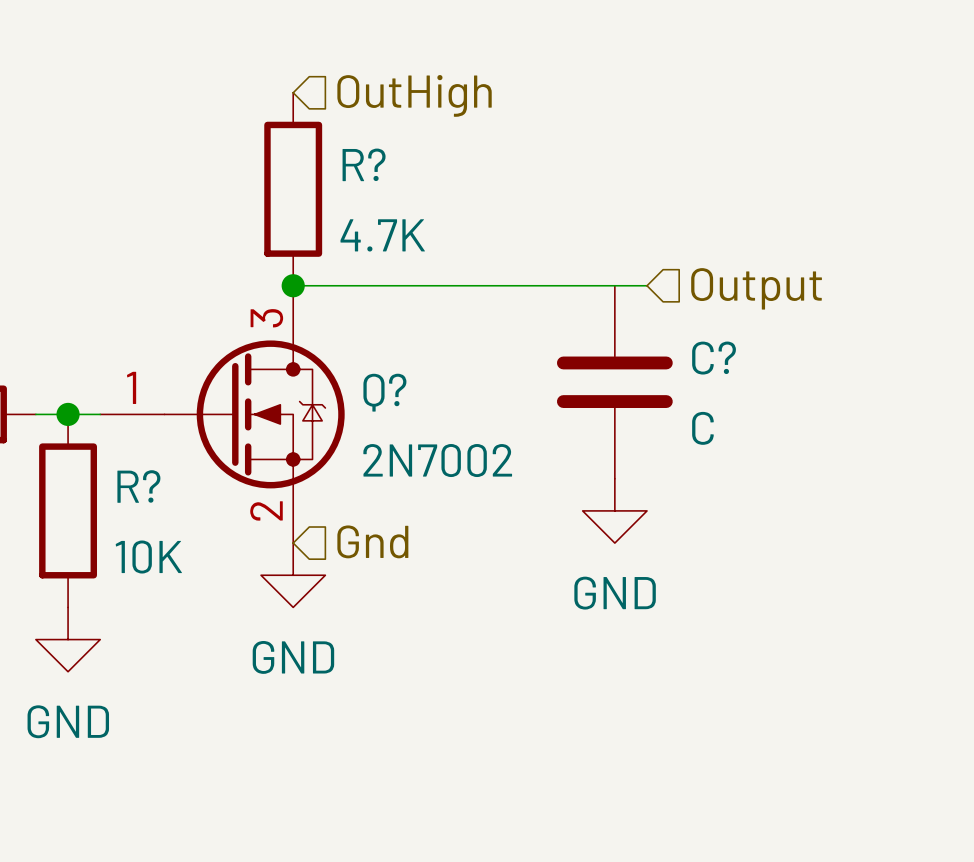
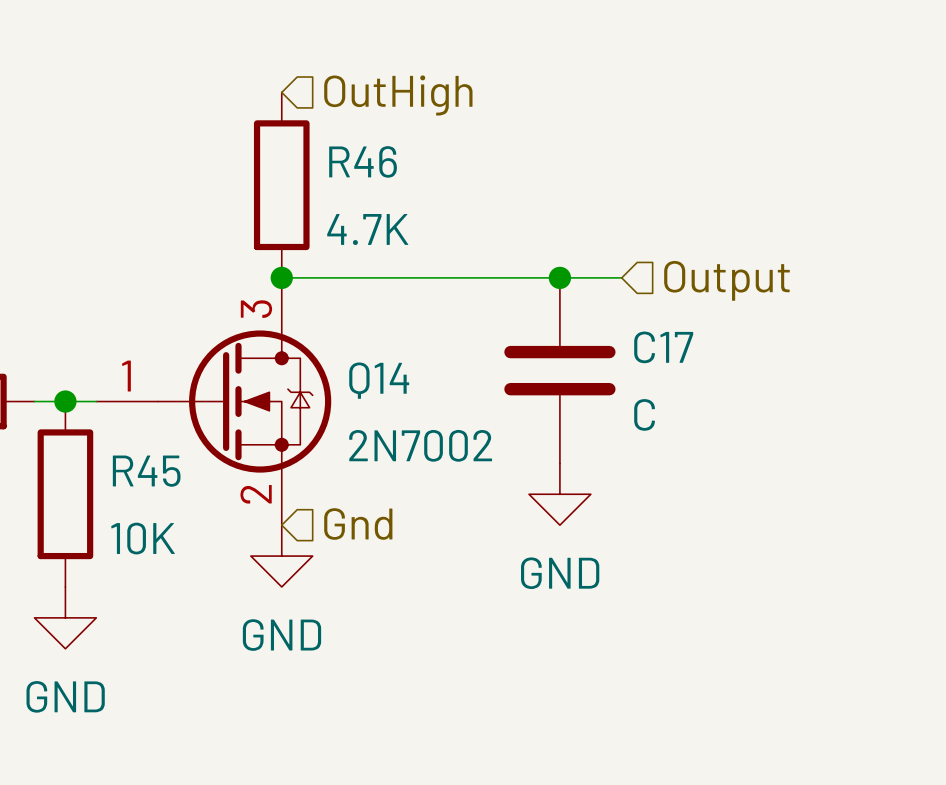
R? name: R? (364, 164) -> R46 (363, 161)
junction: none -> (559, 277)
C17: none -> C (559, 370)
C?: C (614, 382) -> none
Q? name: Q? (384, 392) -> Q14 (379, 380)
R? name: R? (138, 486) -> R45 (146, 471)
power symbol position: GND (614, 510) -> GND (559, 494)

